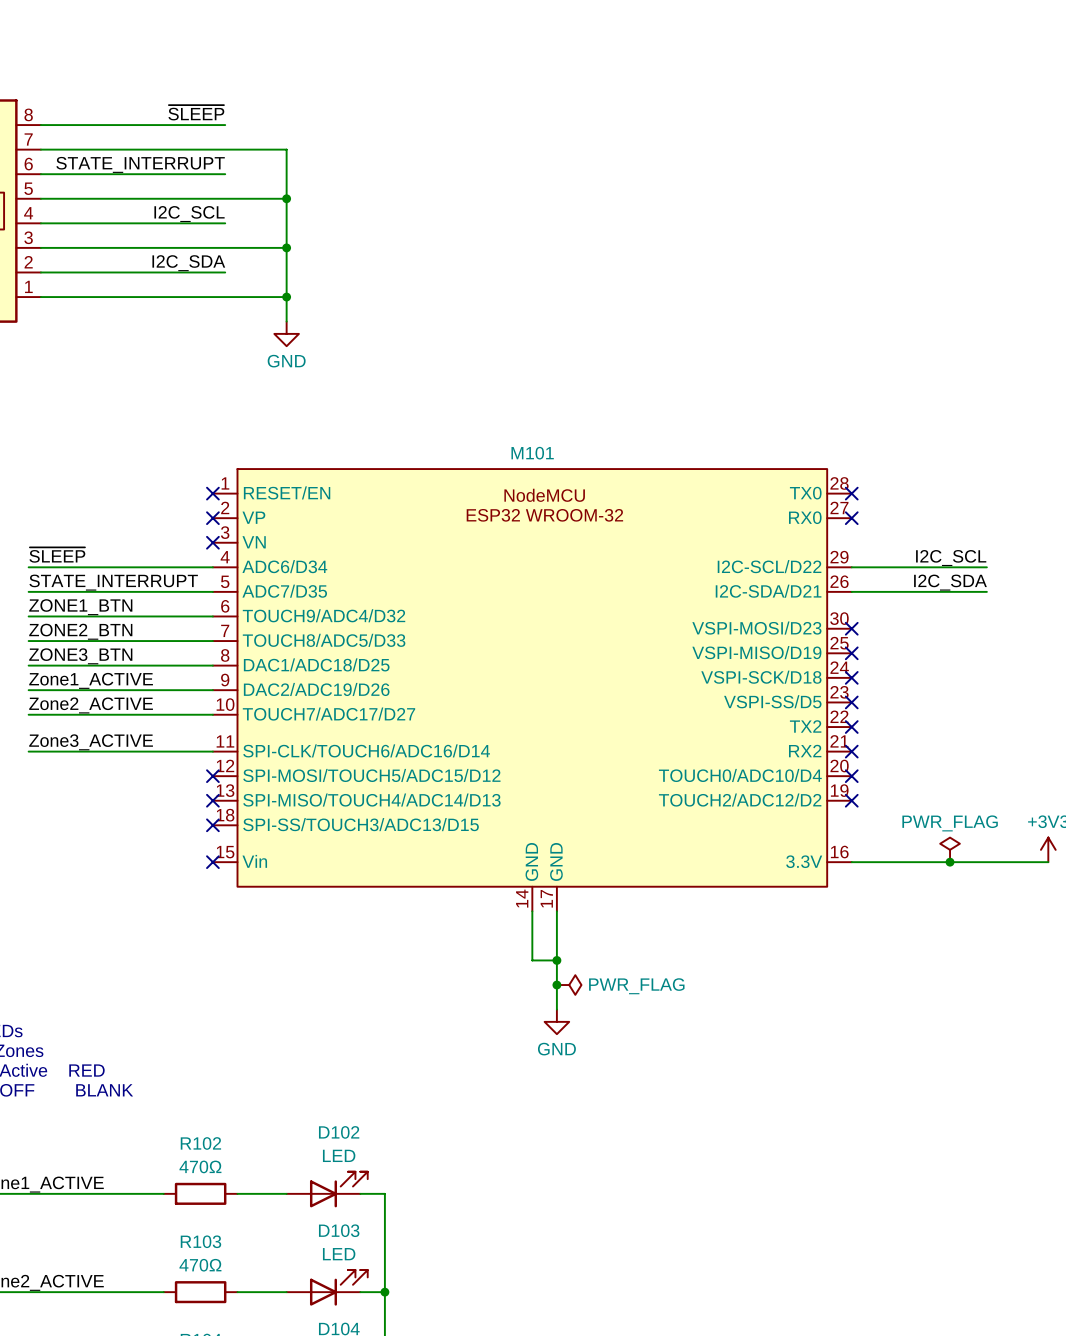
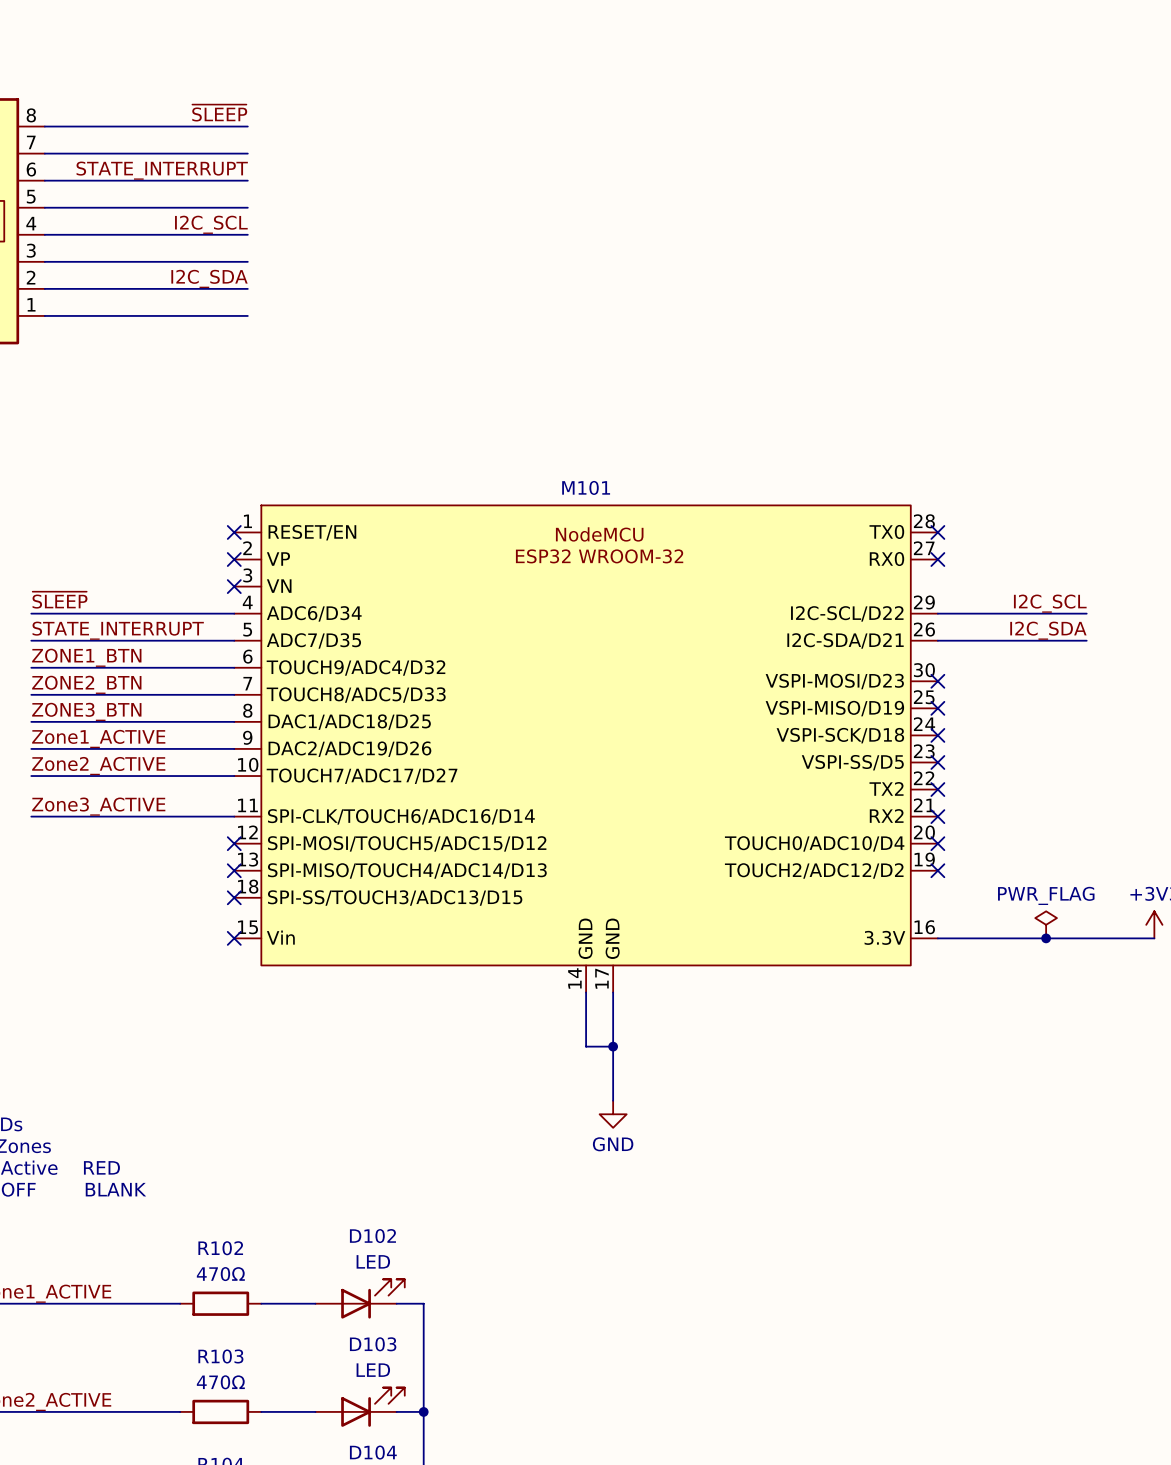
wire: (225, 149) (286, 149) (286, 321) -> none
wire: (225, 198) (286, 198) -> none
junction: (286, 198) -> none
wire: (225, 247) (286, 247) -> none
junction: (286, 247) -> none
wire: (225, 297) (286, 297) -> none
junction: (286, 297) -> none
power symbol: GND (286, 333) -> none
junction: (556, 985) -> none
power symbol: PWR_FLAG (569, 985) -> none

